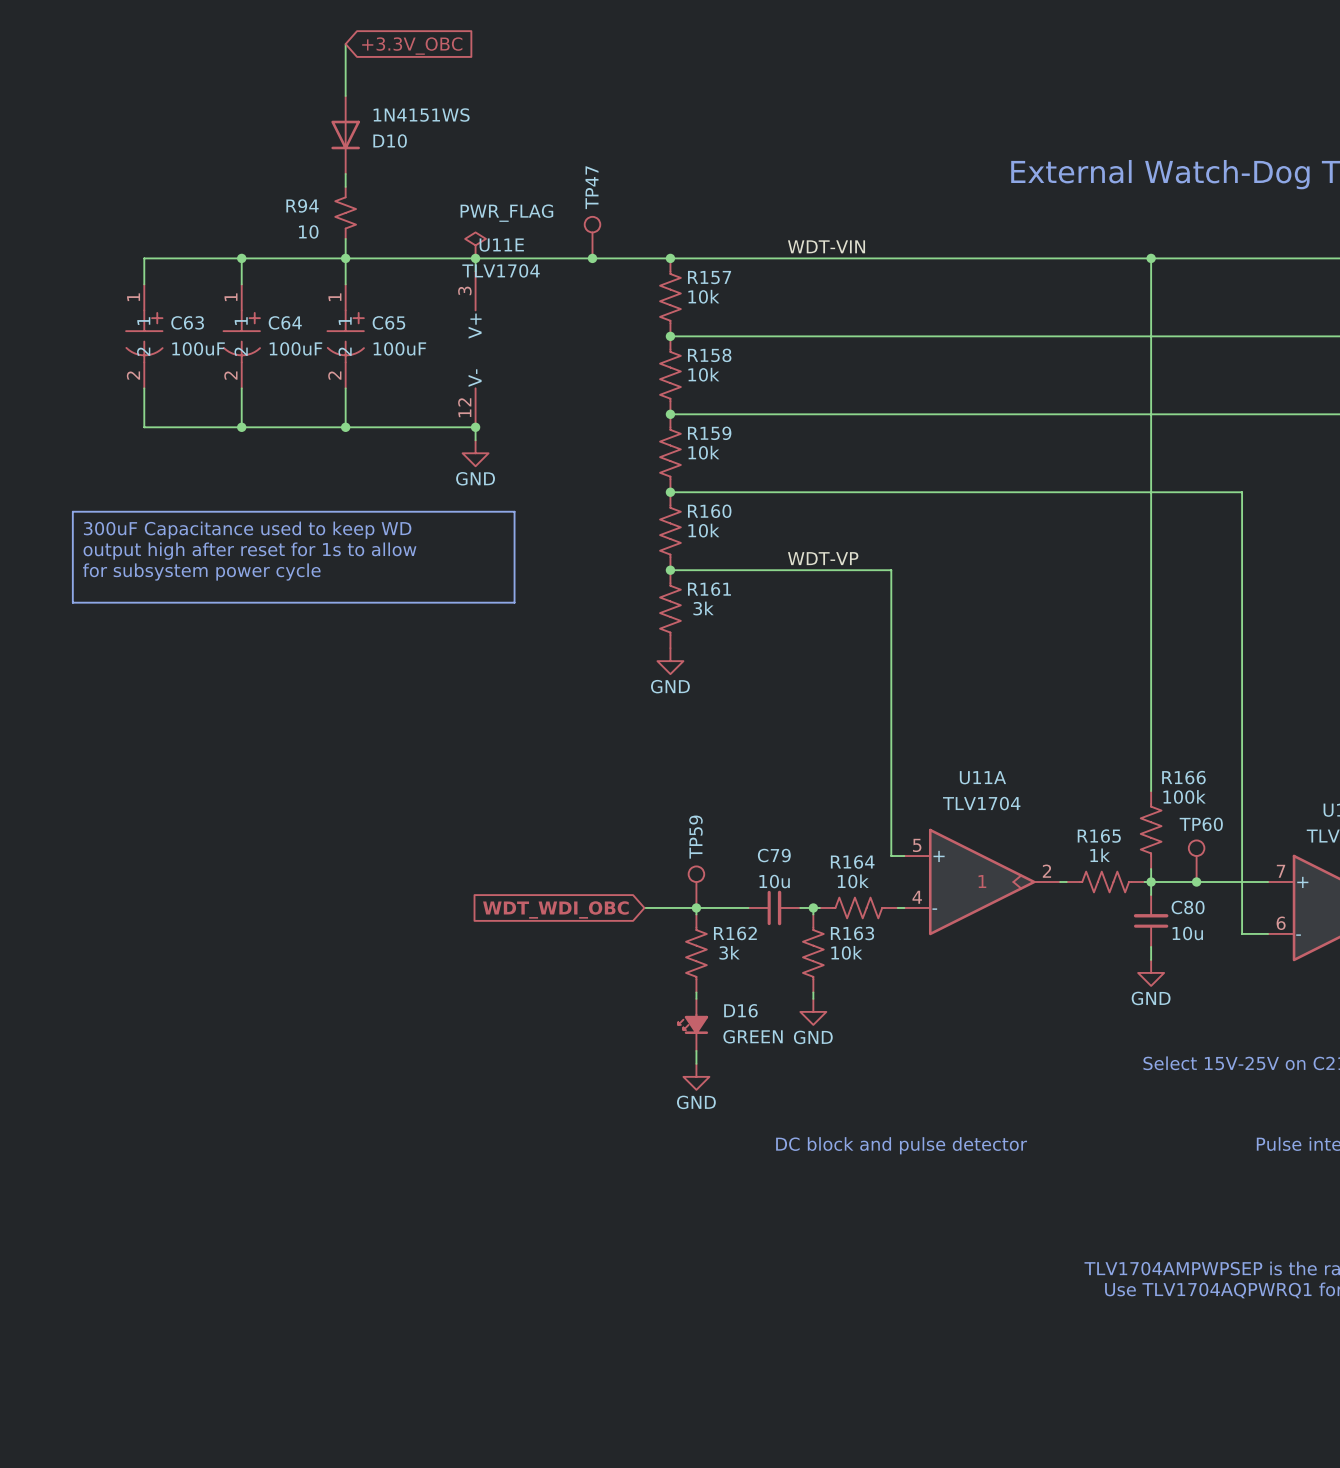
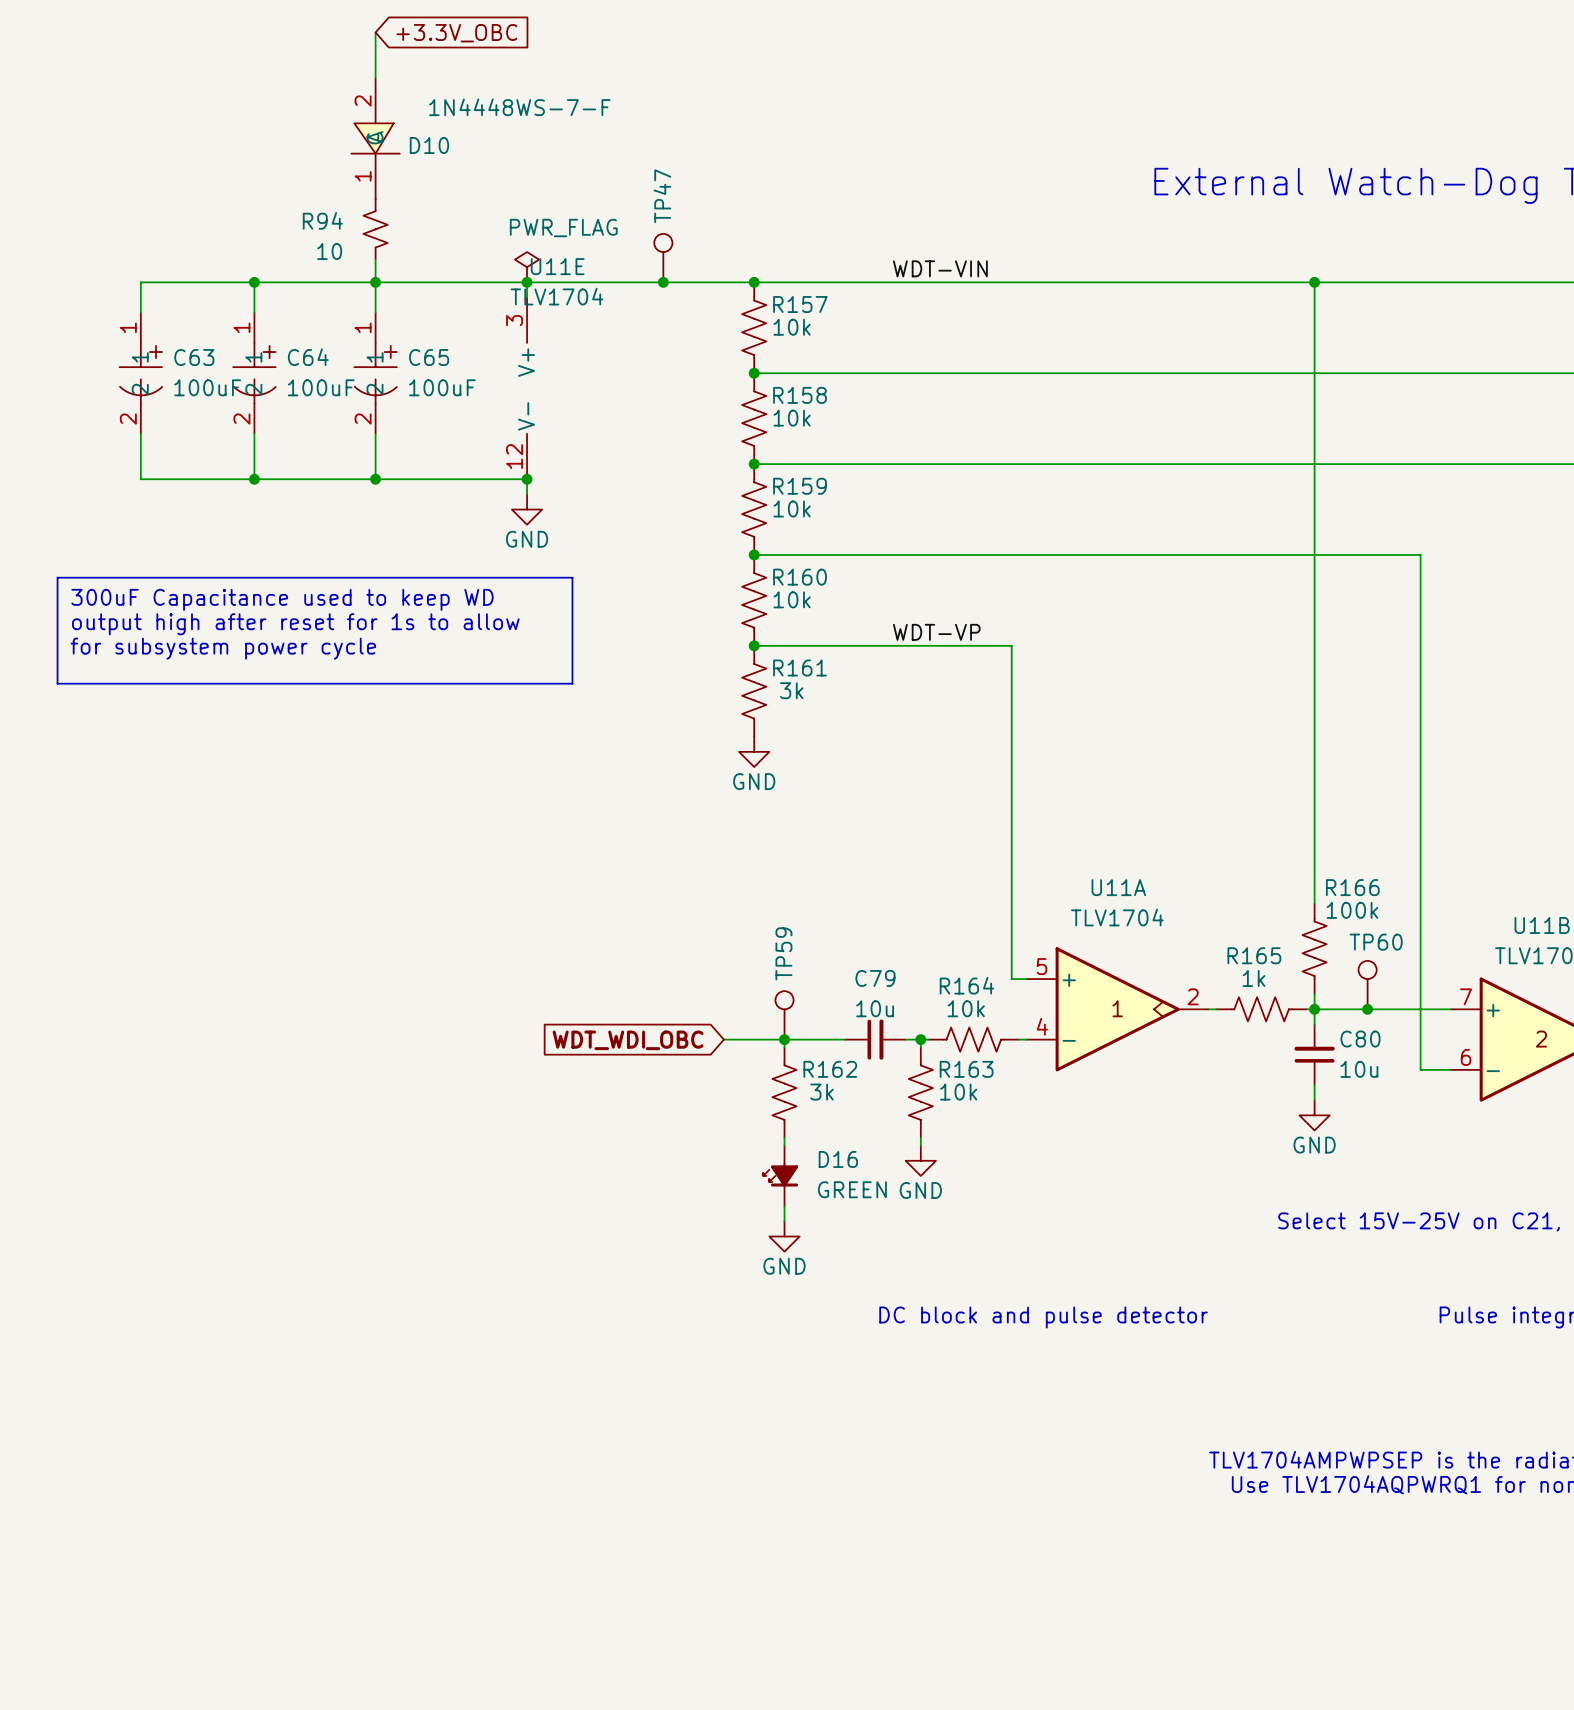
D10 symbol: [331, 96, 360, 174] -> [351, 77, 400, 200]
D10 value: 1N4151WS (421, 115) -> 1N4448WS-7-F (519, 107)

